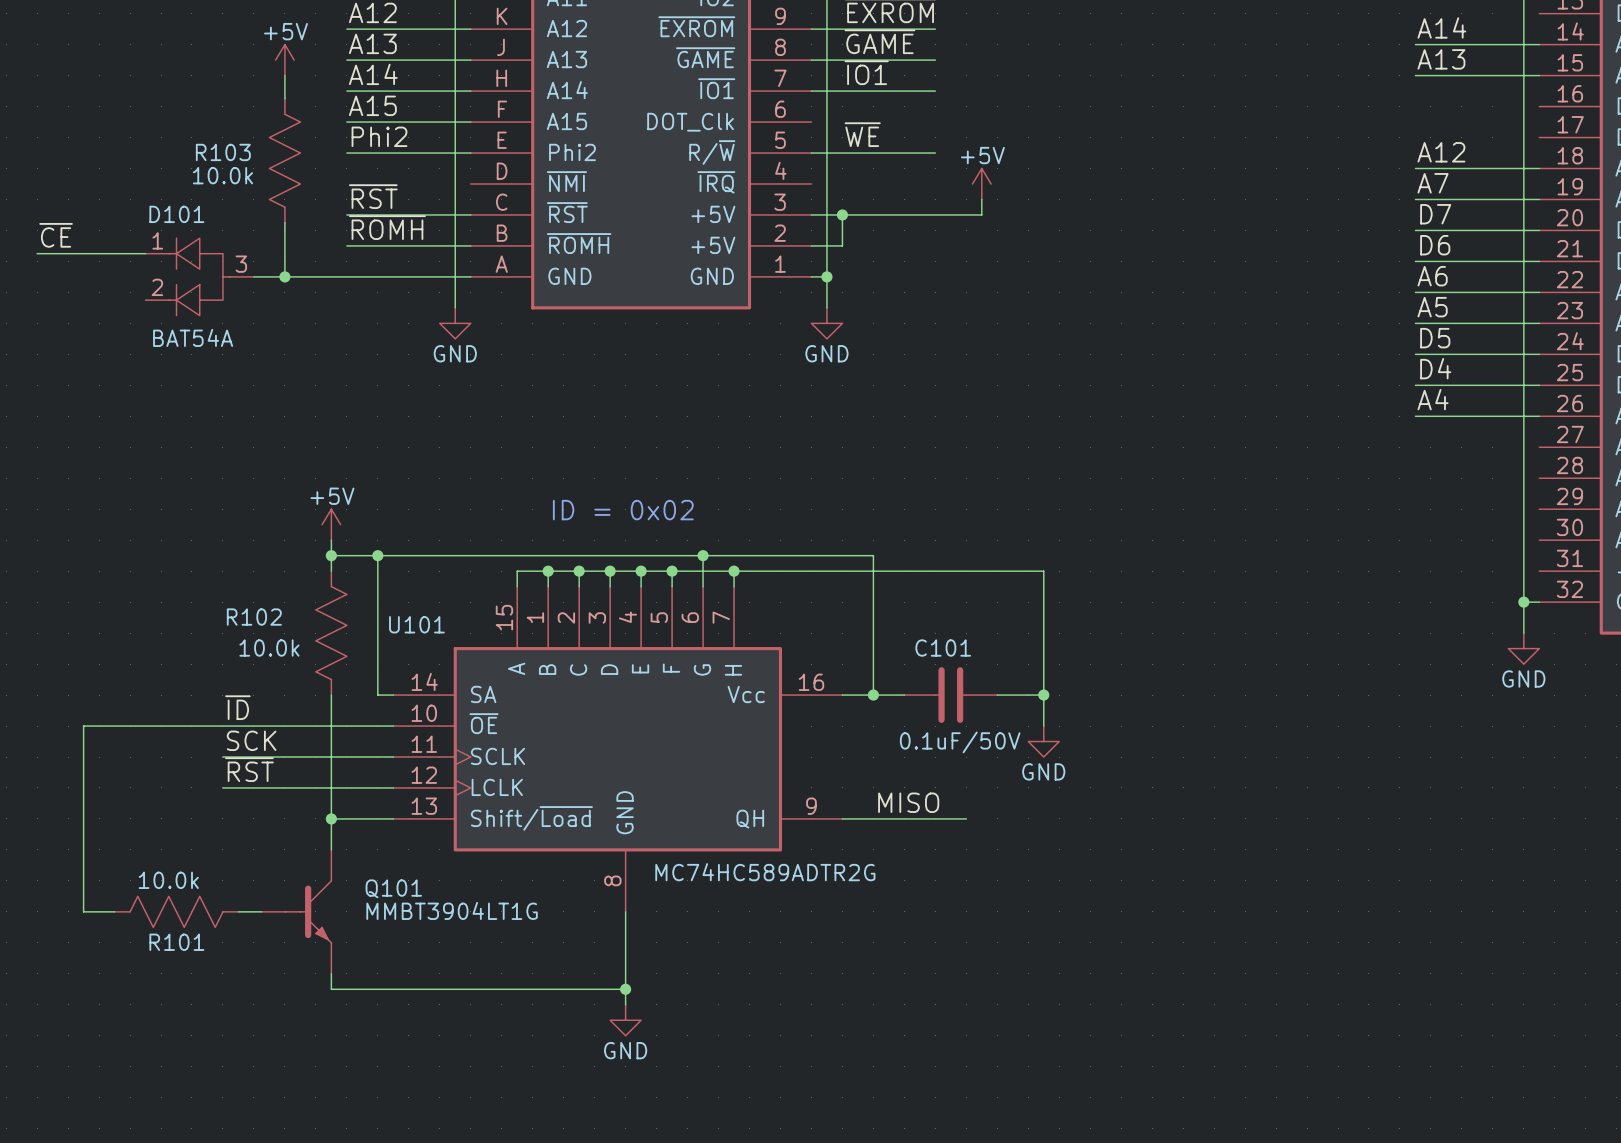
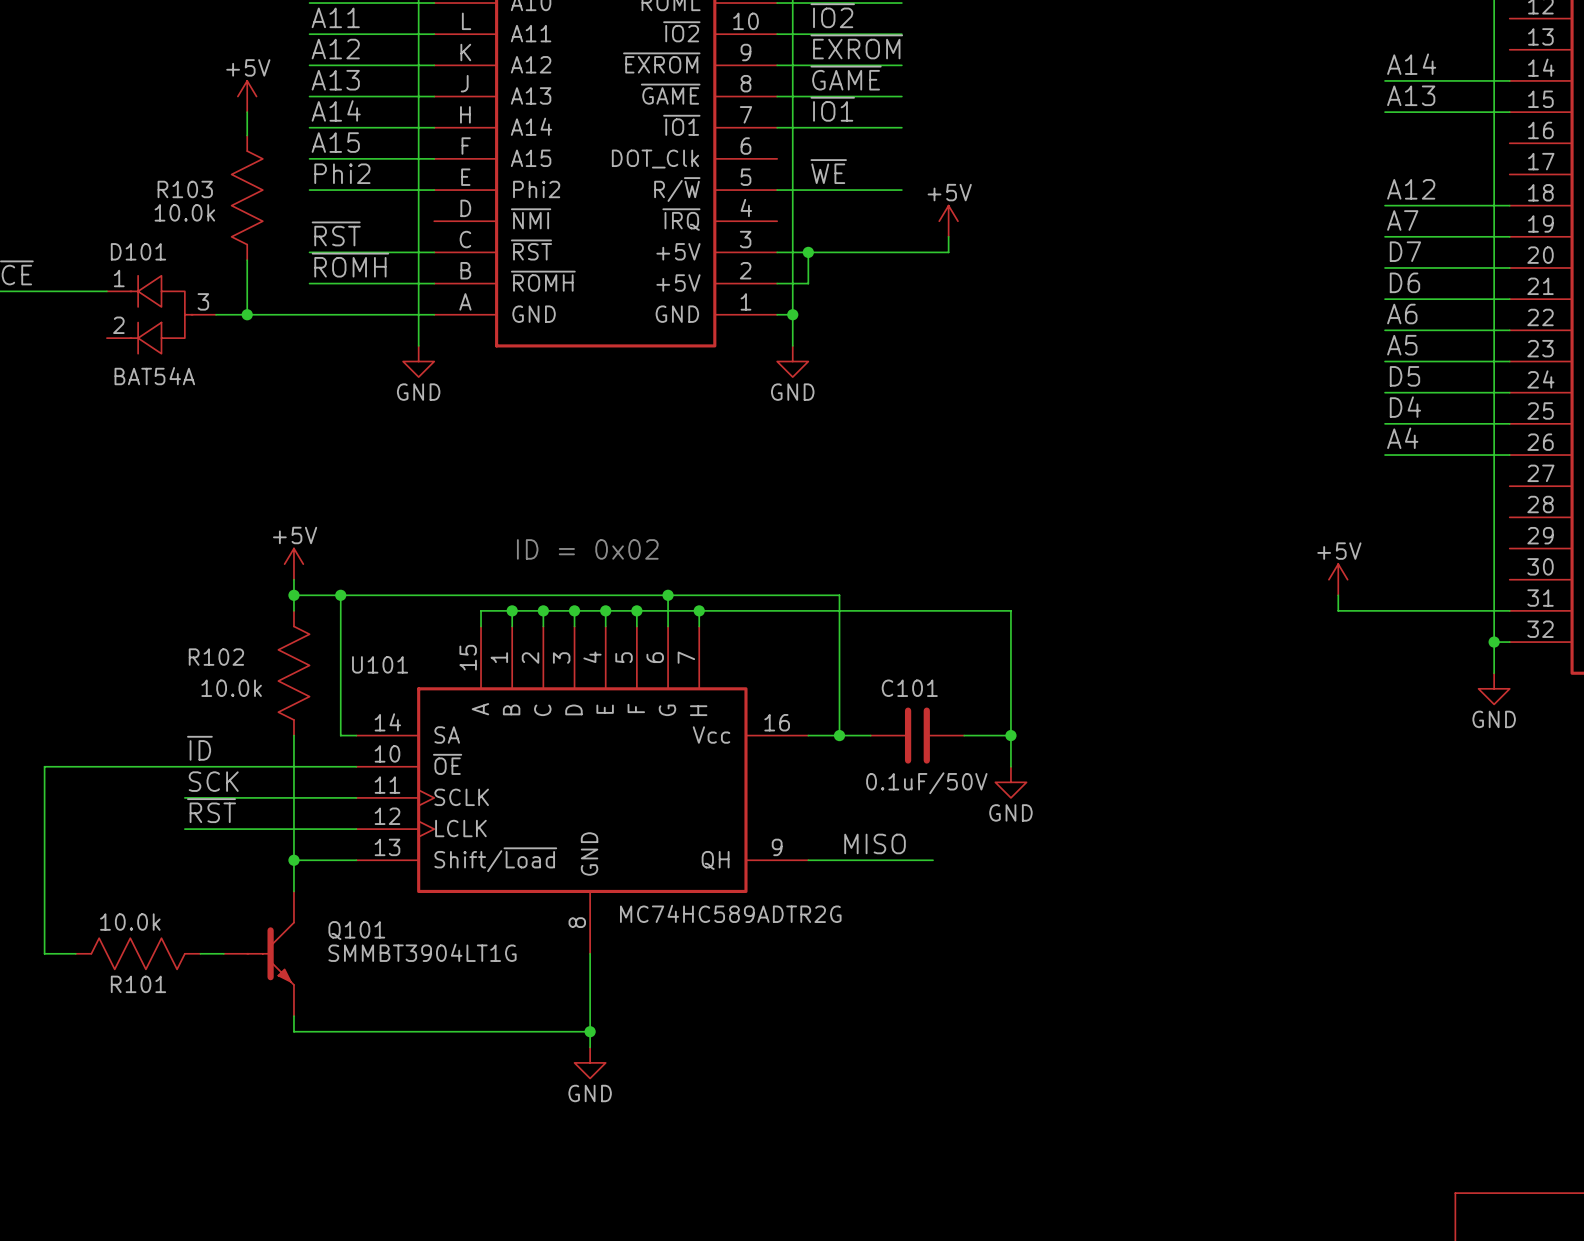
power symbol: none -> +5V (1338, 579)
wire: none -> (1338, 595) (1338, 610) (1509, 610)
Q101 value: MMBT3904LT1G (452, 910) -> SMMBT3904LT1G (422, 952)

